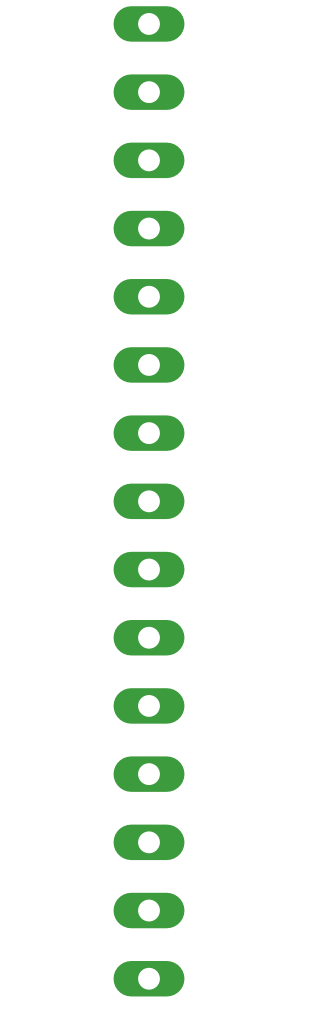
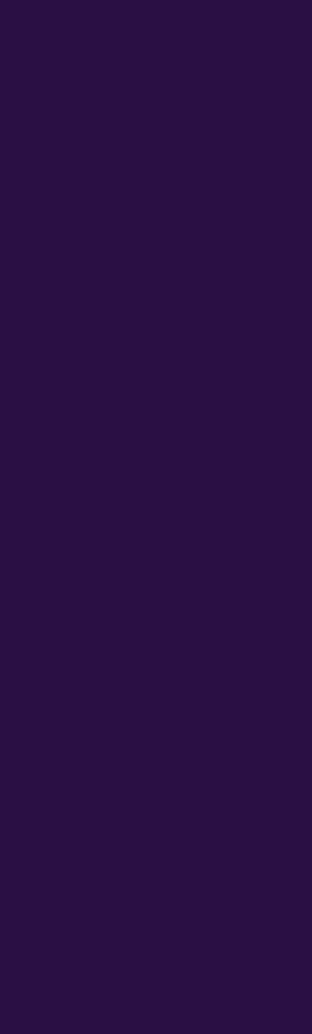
part: (149, 92) -> none
part: (149, 296) -> none
part: (149, 501) -> none
part: (149, 705) -> none
part: (149, 910) -> none

